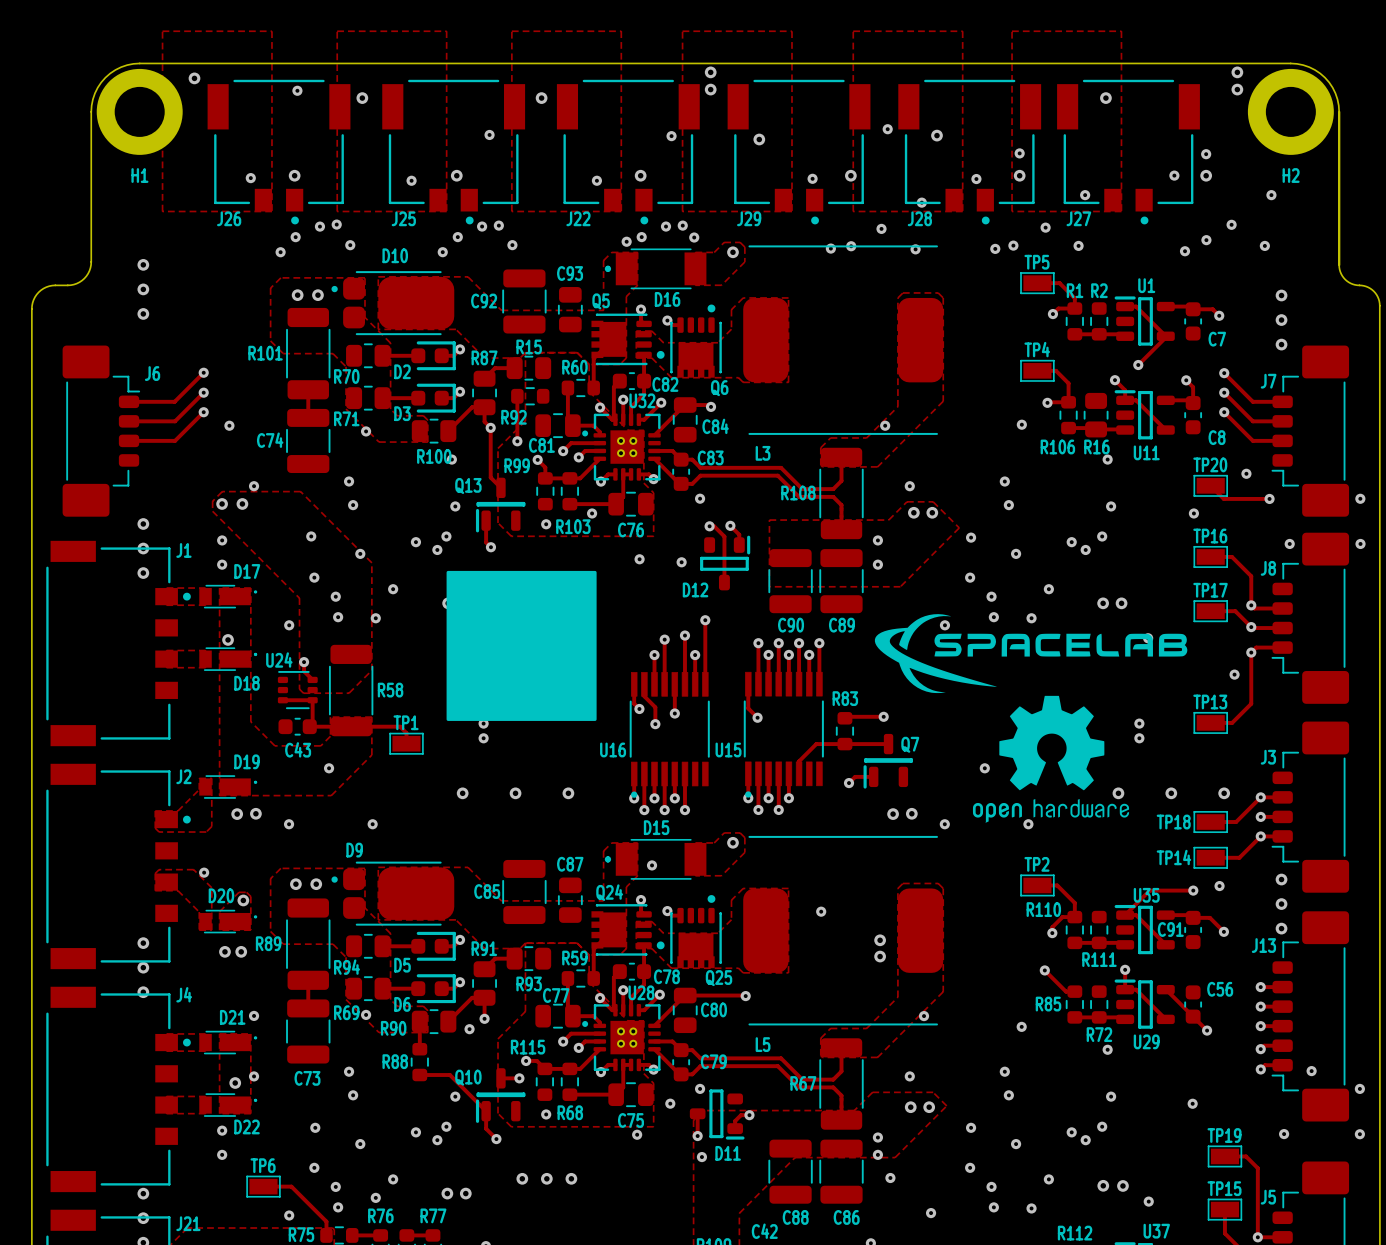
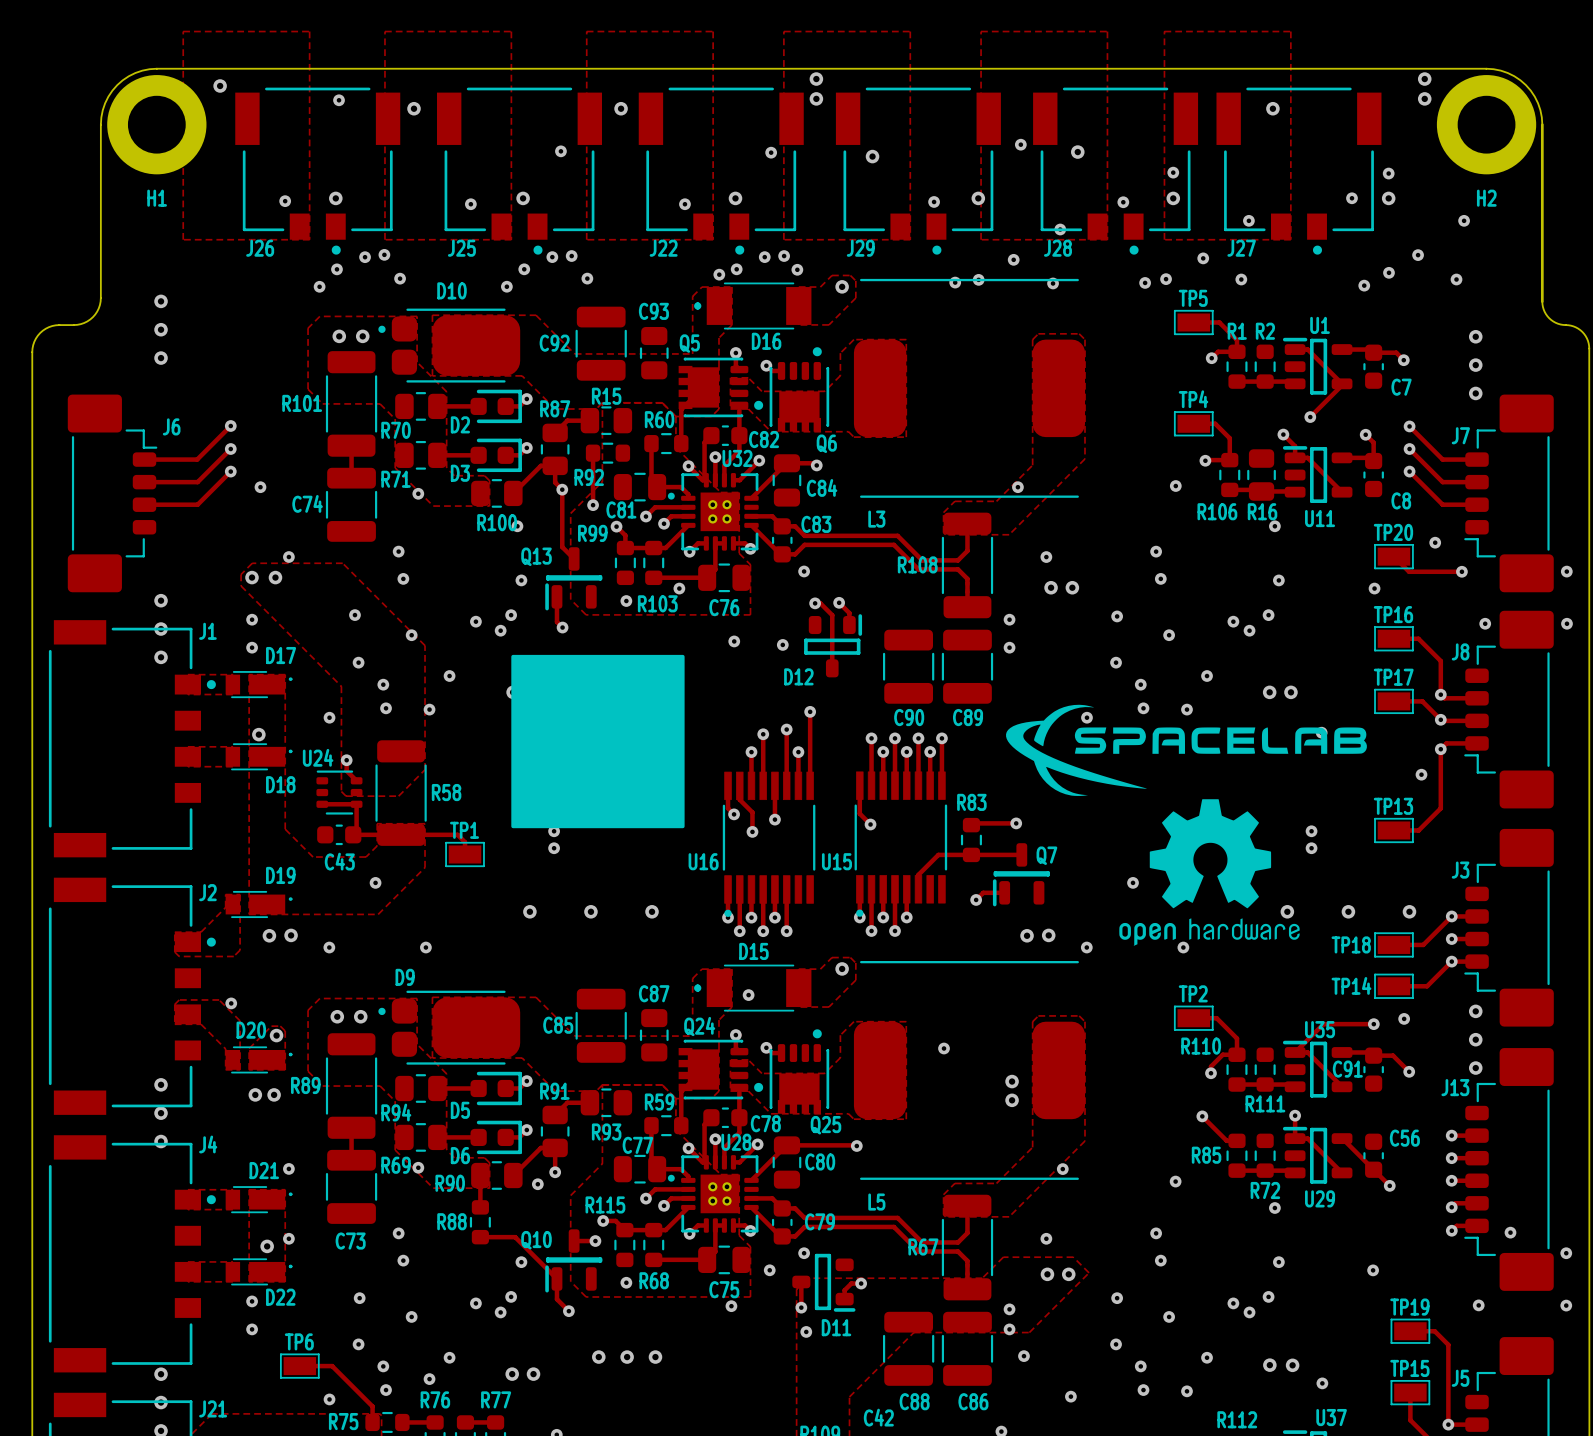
zone outline: (906, 501) (888, 520) (769, 520) (769, 586) (900, 586) (959, 527) (933, 501) (906, 501) -> none

